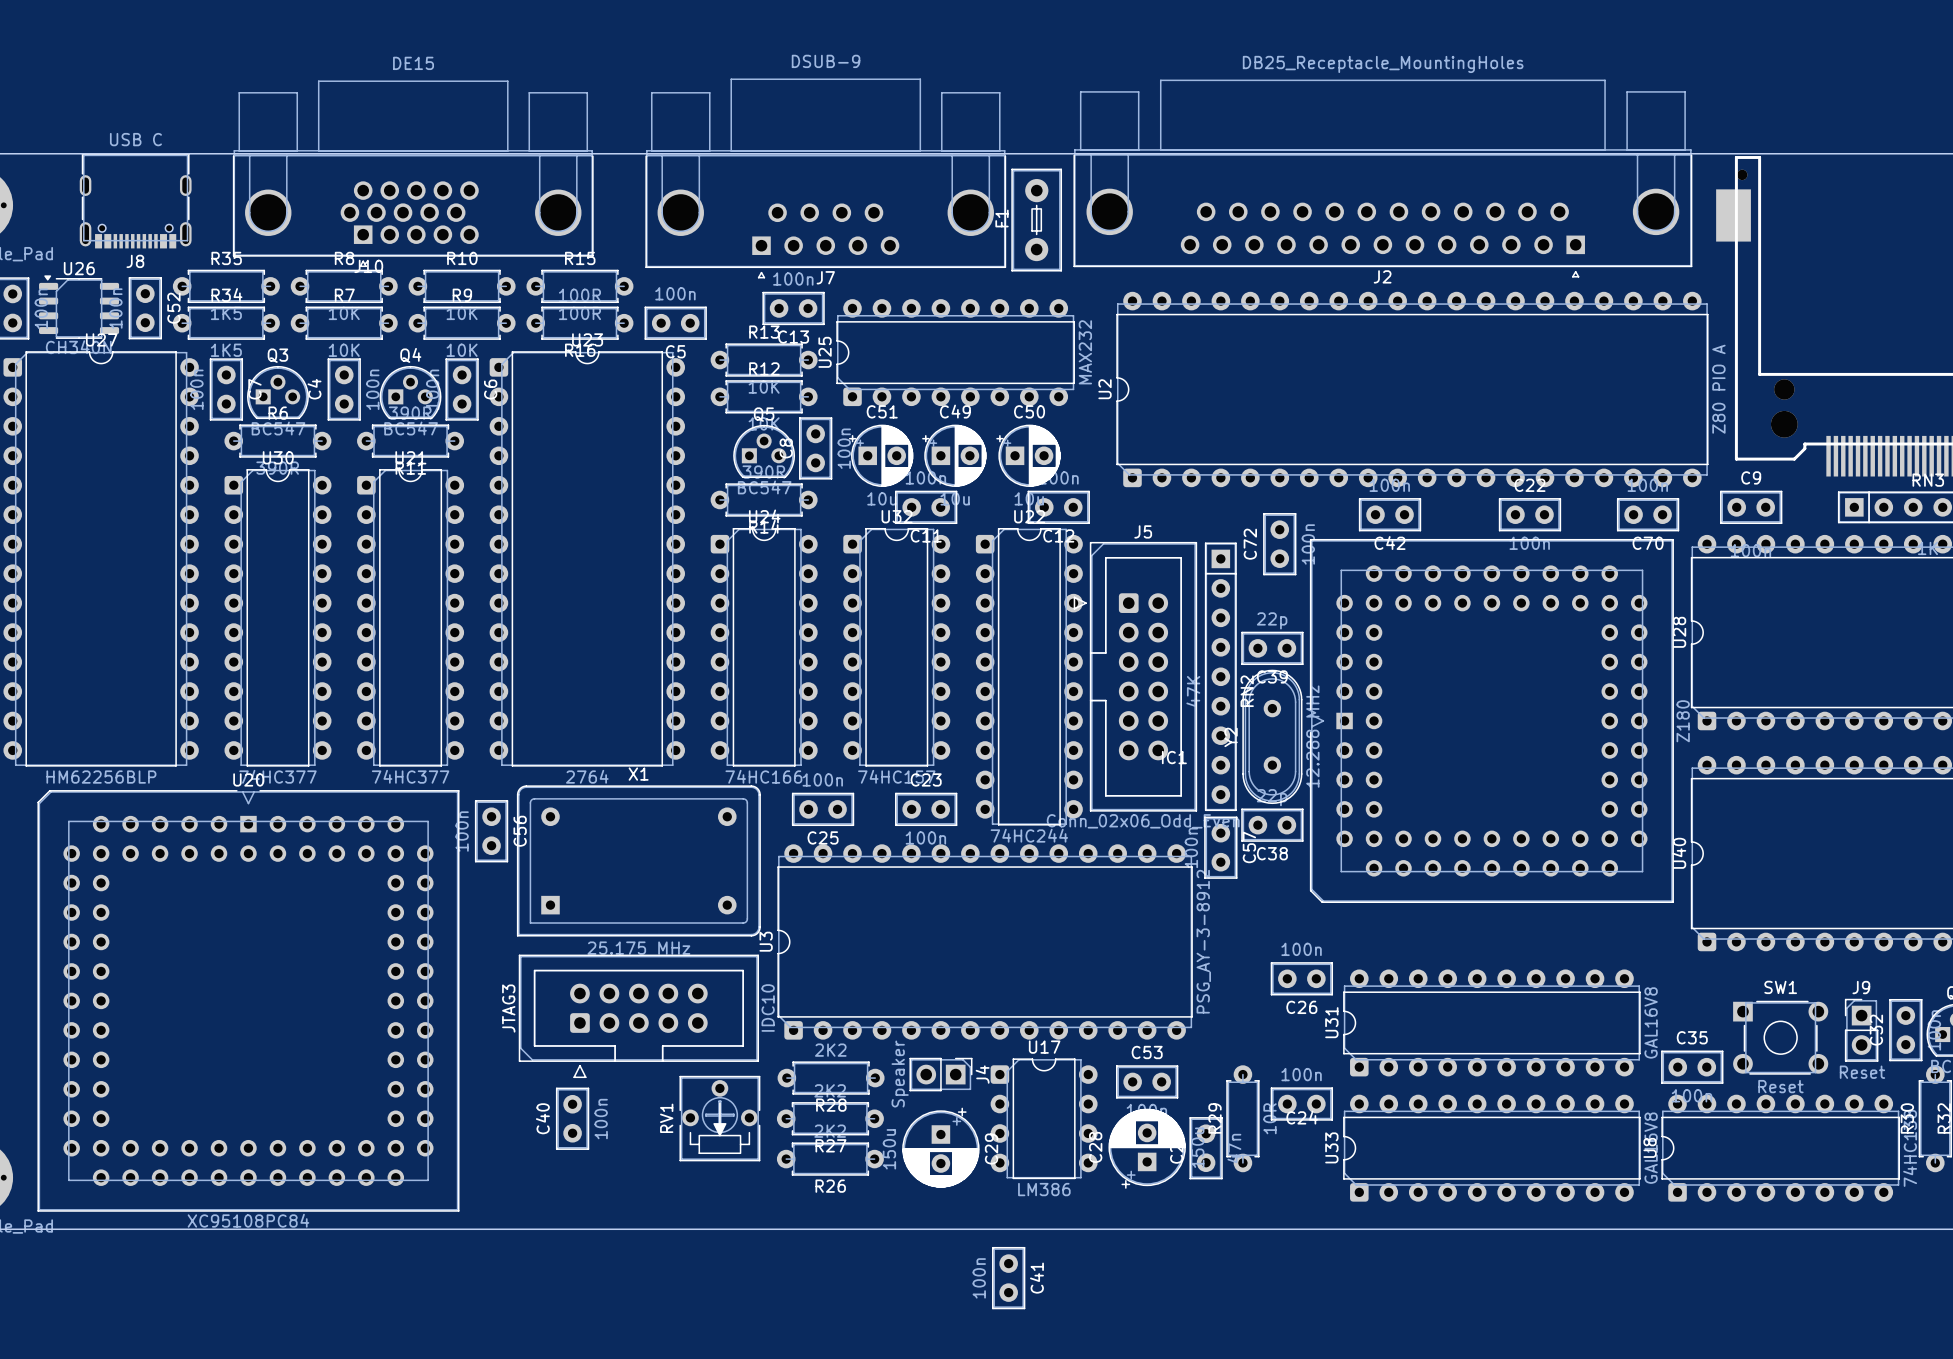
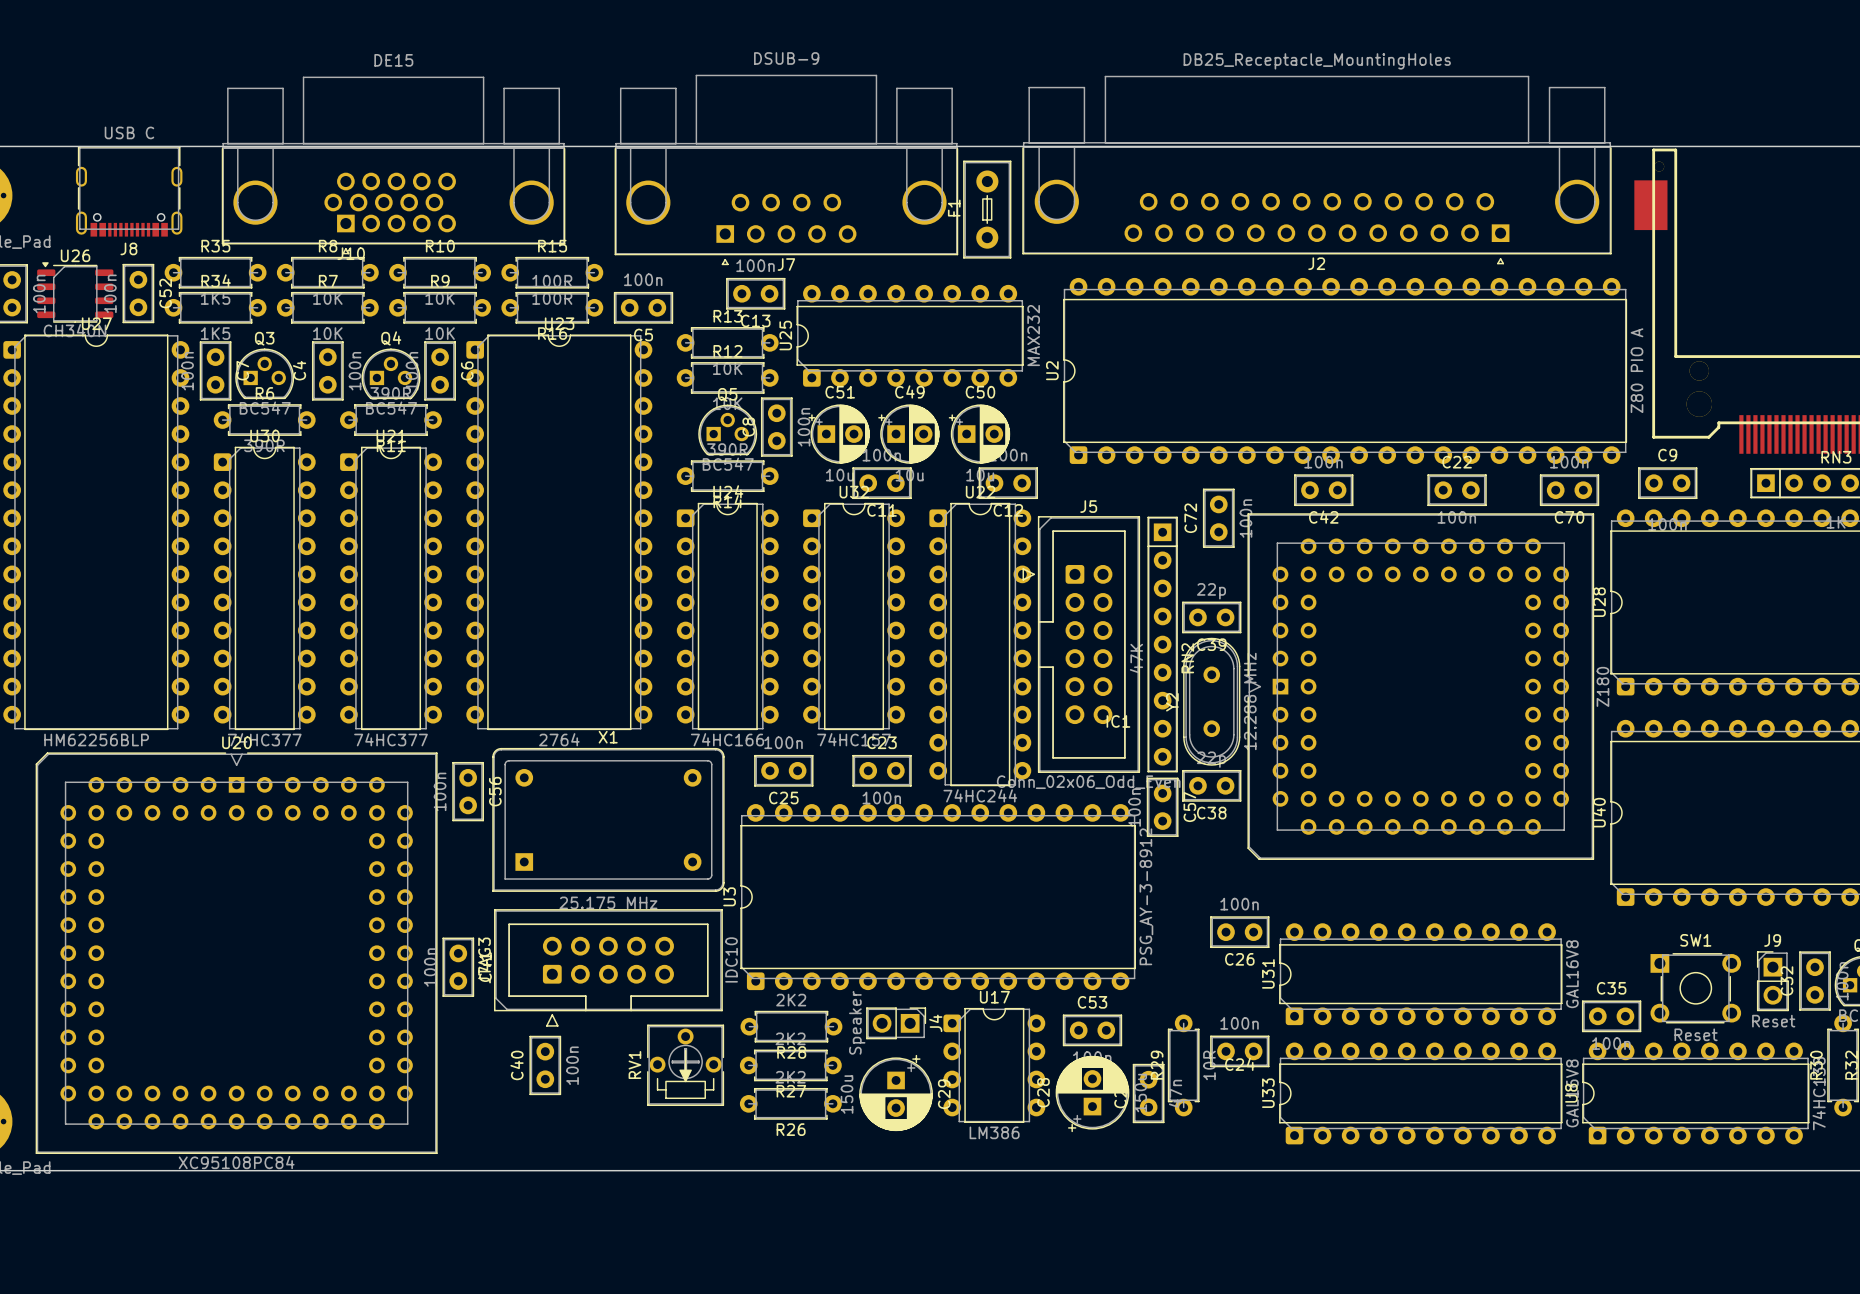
C41 position: (1008, 1278) -> (458, 967)

